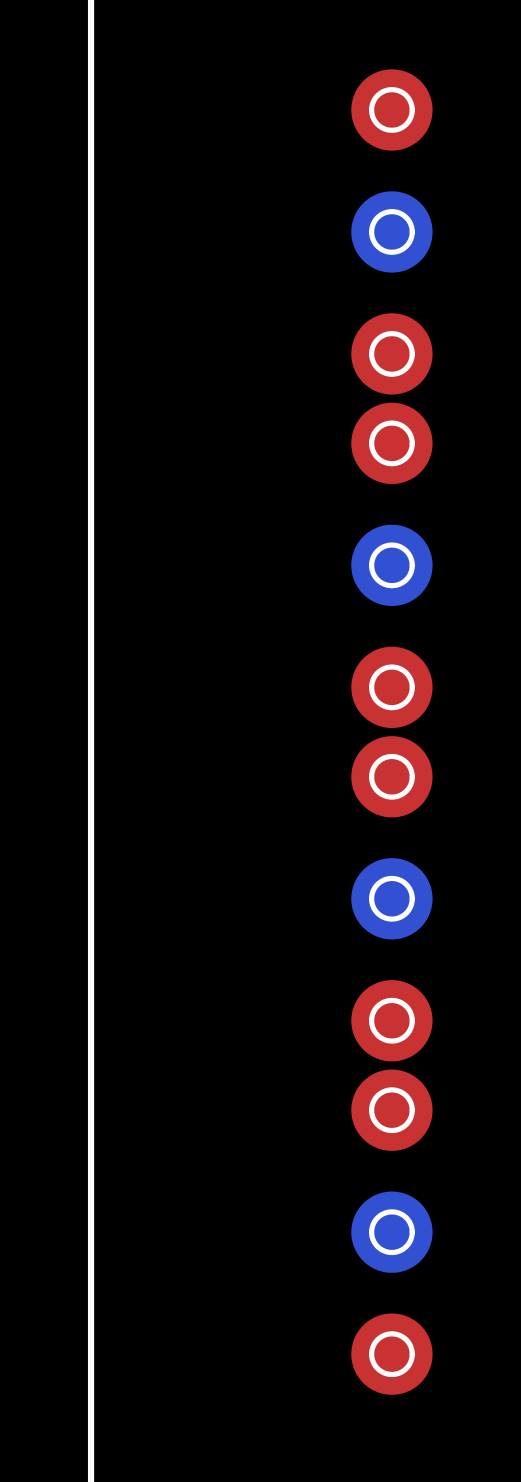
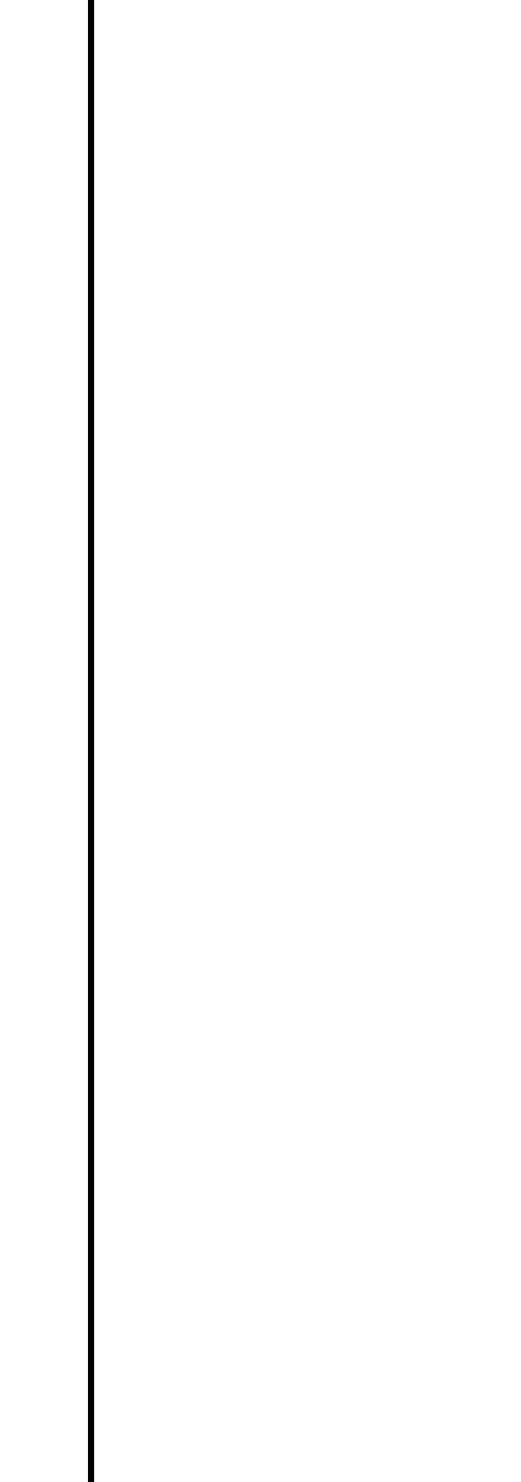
part: (391, 231) -> none
part: (391, 565) -> none
part: (391, 898) -> none
part: (391, 1232) -> none

